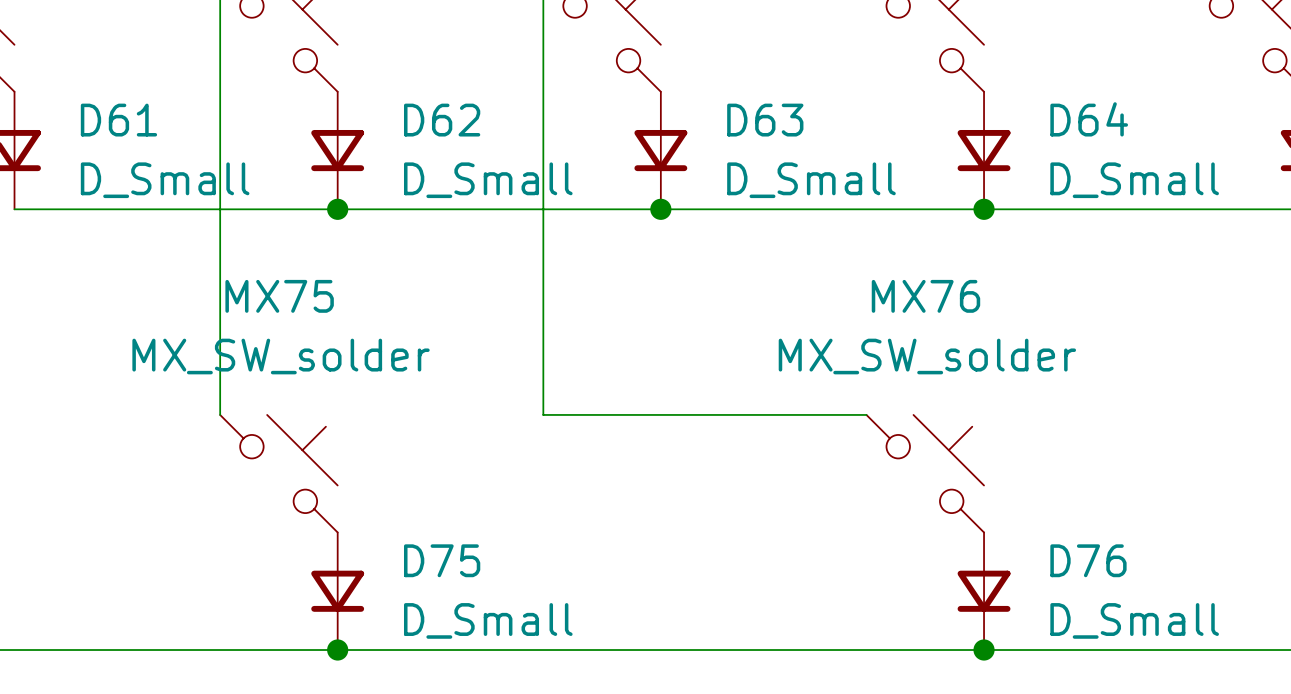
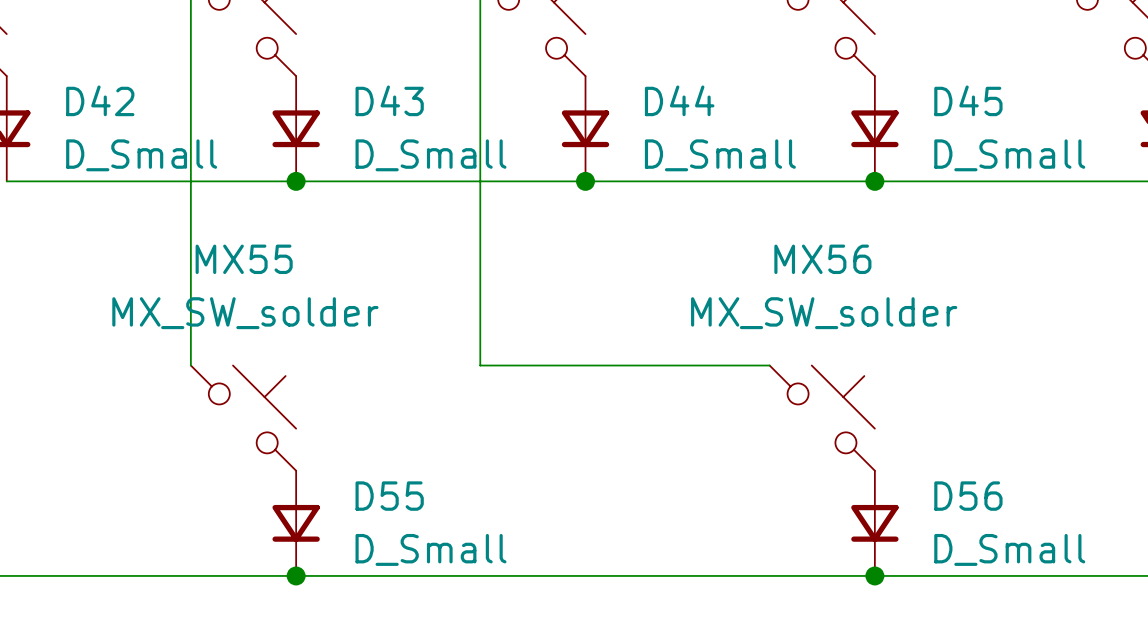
D64 name: D64 (1089, 119) -> D45 (968, 100)
D61 name: D61 (118, 120) -> D42 (100, 100)
D62 name: D62 (442, 120) -> D43 (389, 100)
D63 name: D63 (765, 120) -> D44 (679, 100)
MX75 name: MX75 (279, 296) -> MX55 (244, 259)
MX76 name: MX76 (925, 296) -> MX56 (822, 259)
D75 name: D75 (442, 560) -> D55 (389, 496)
D76 name: D76 (1088, 560) -> D56 (968, 496)

